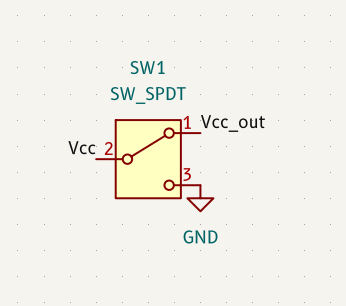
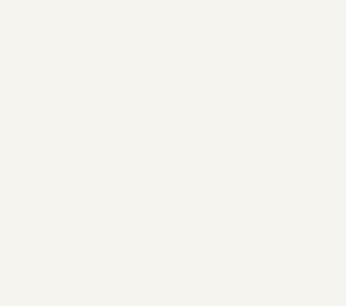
label: Vcc_out (232, 123) -> none
label: Vcc (81, 147) -> none
SW1: SW_SPDT (148, 159) -> none
power symbol: GND (200, 198) -> none

